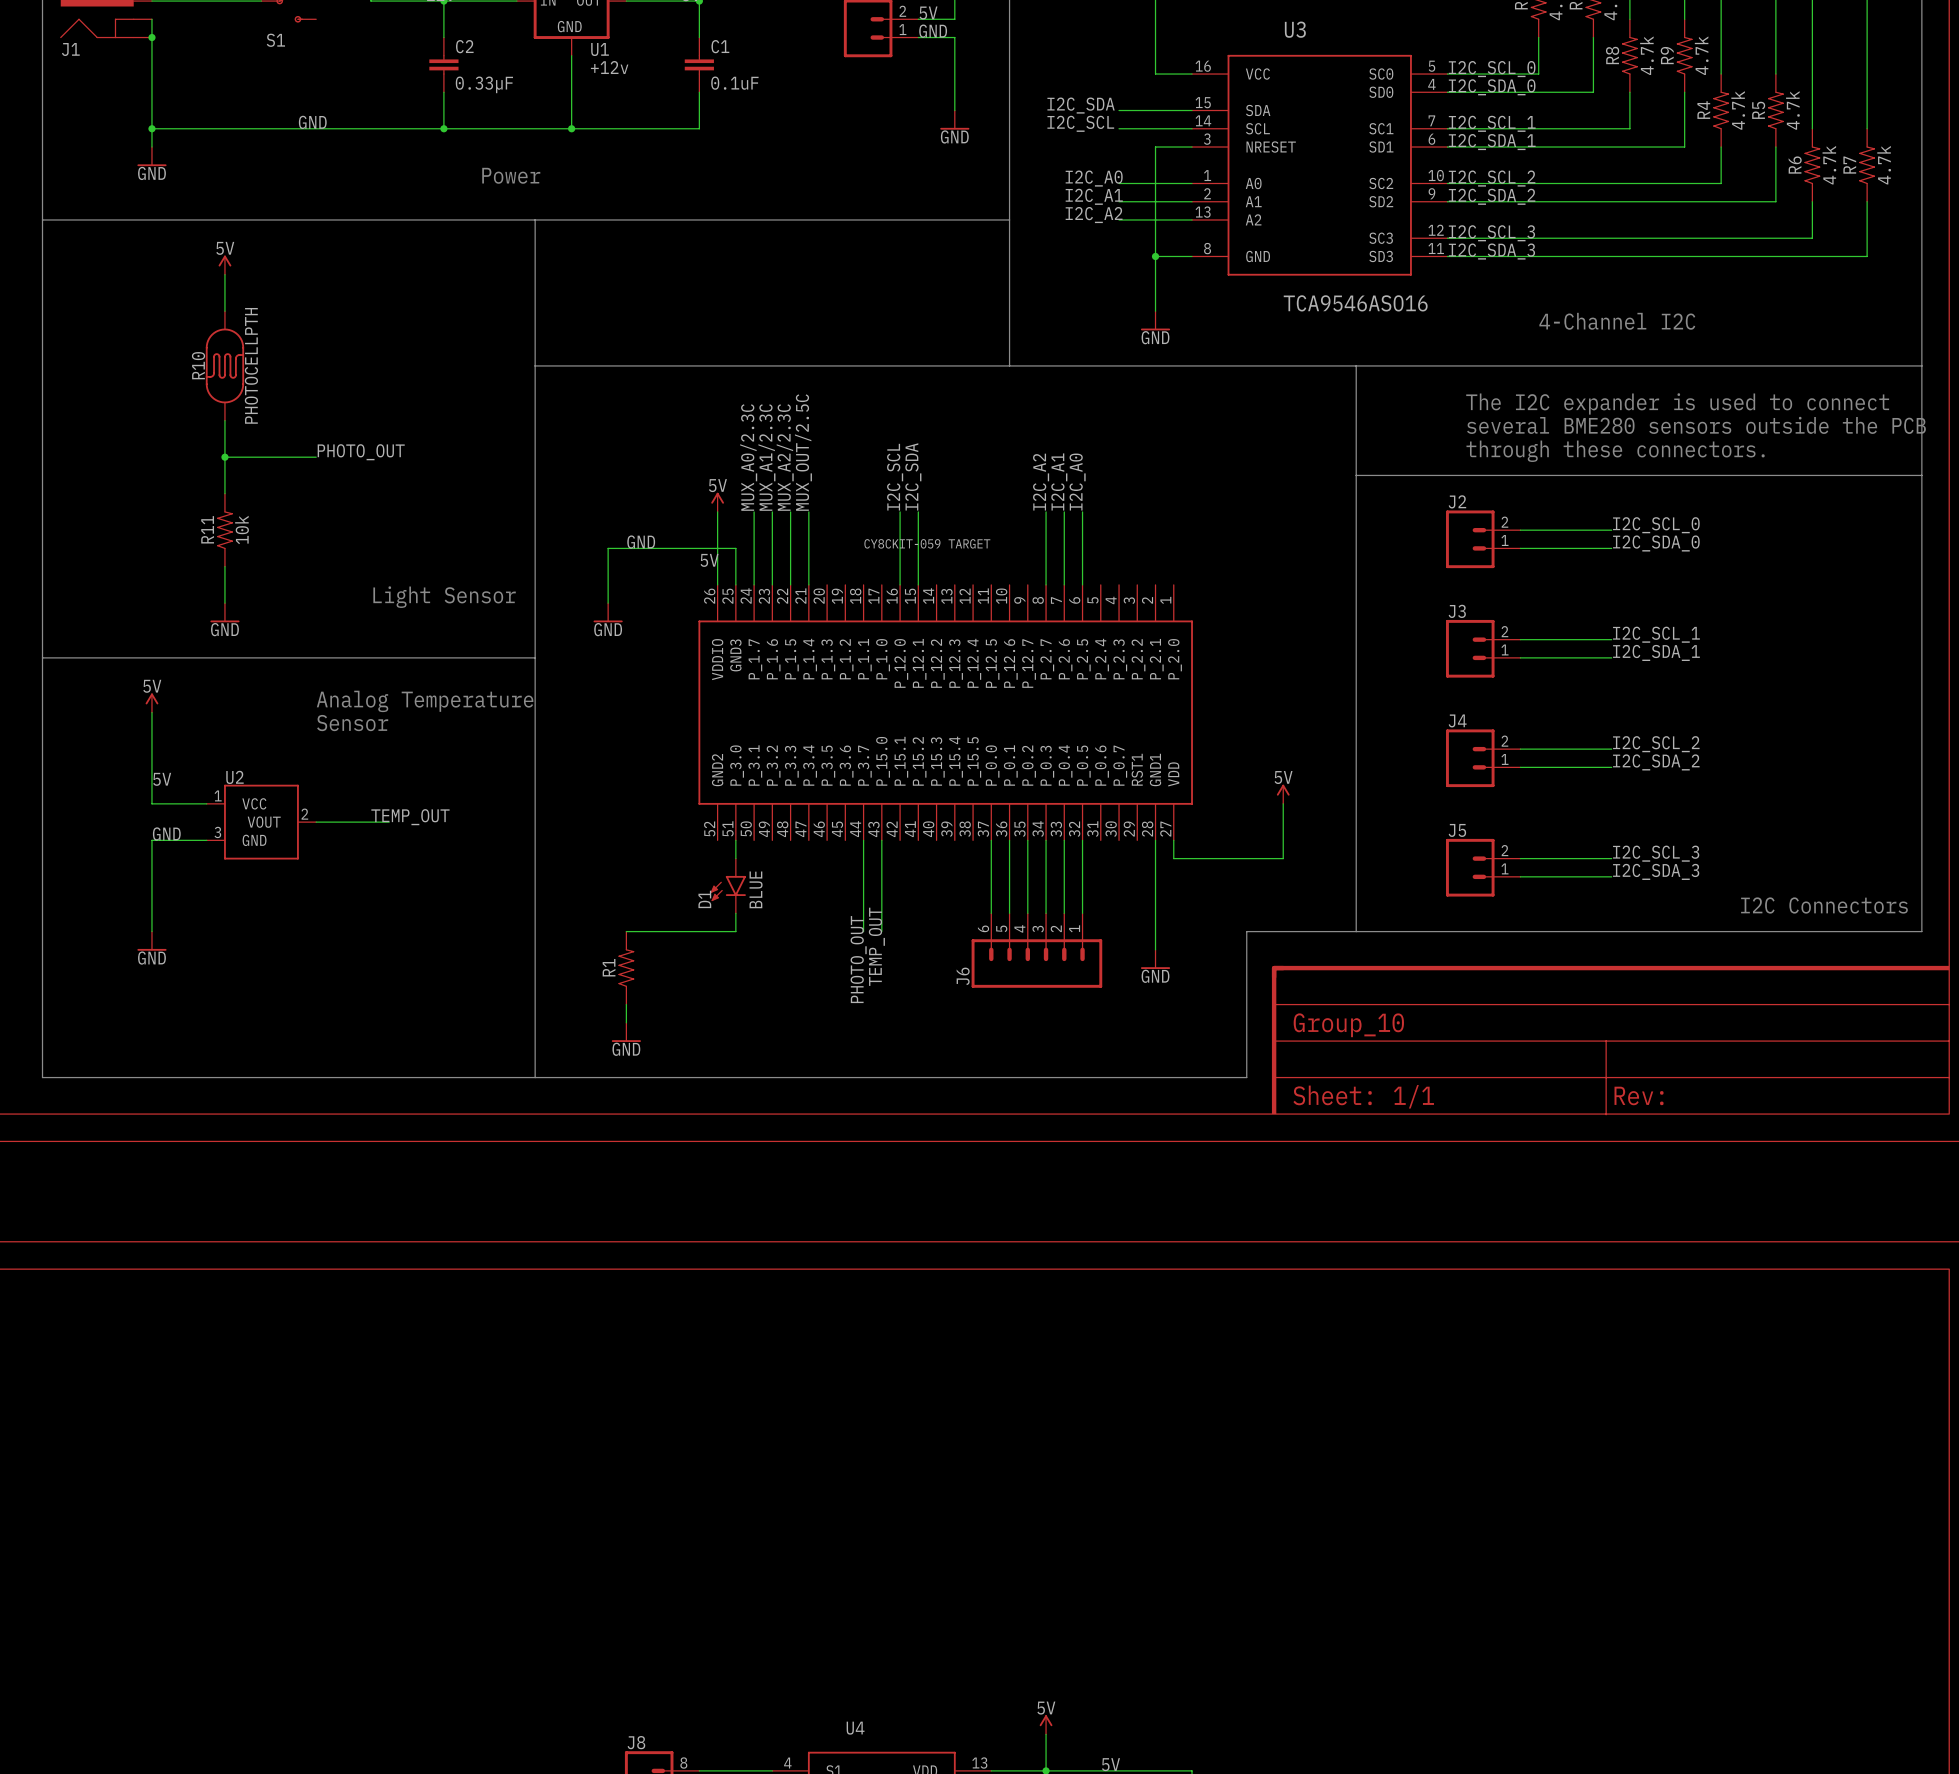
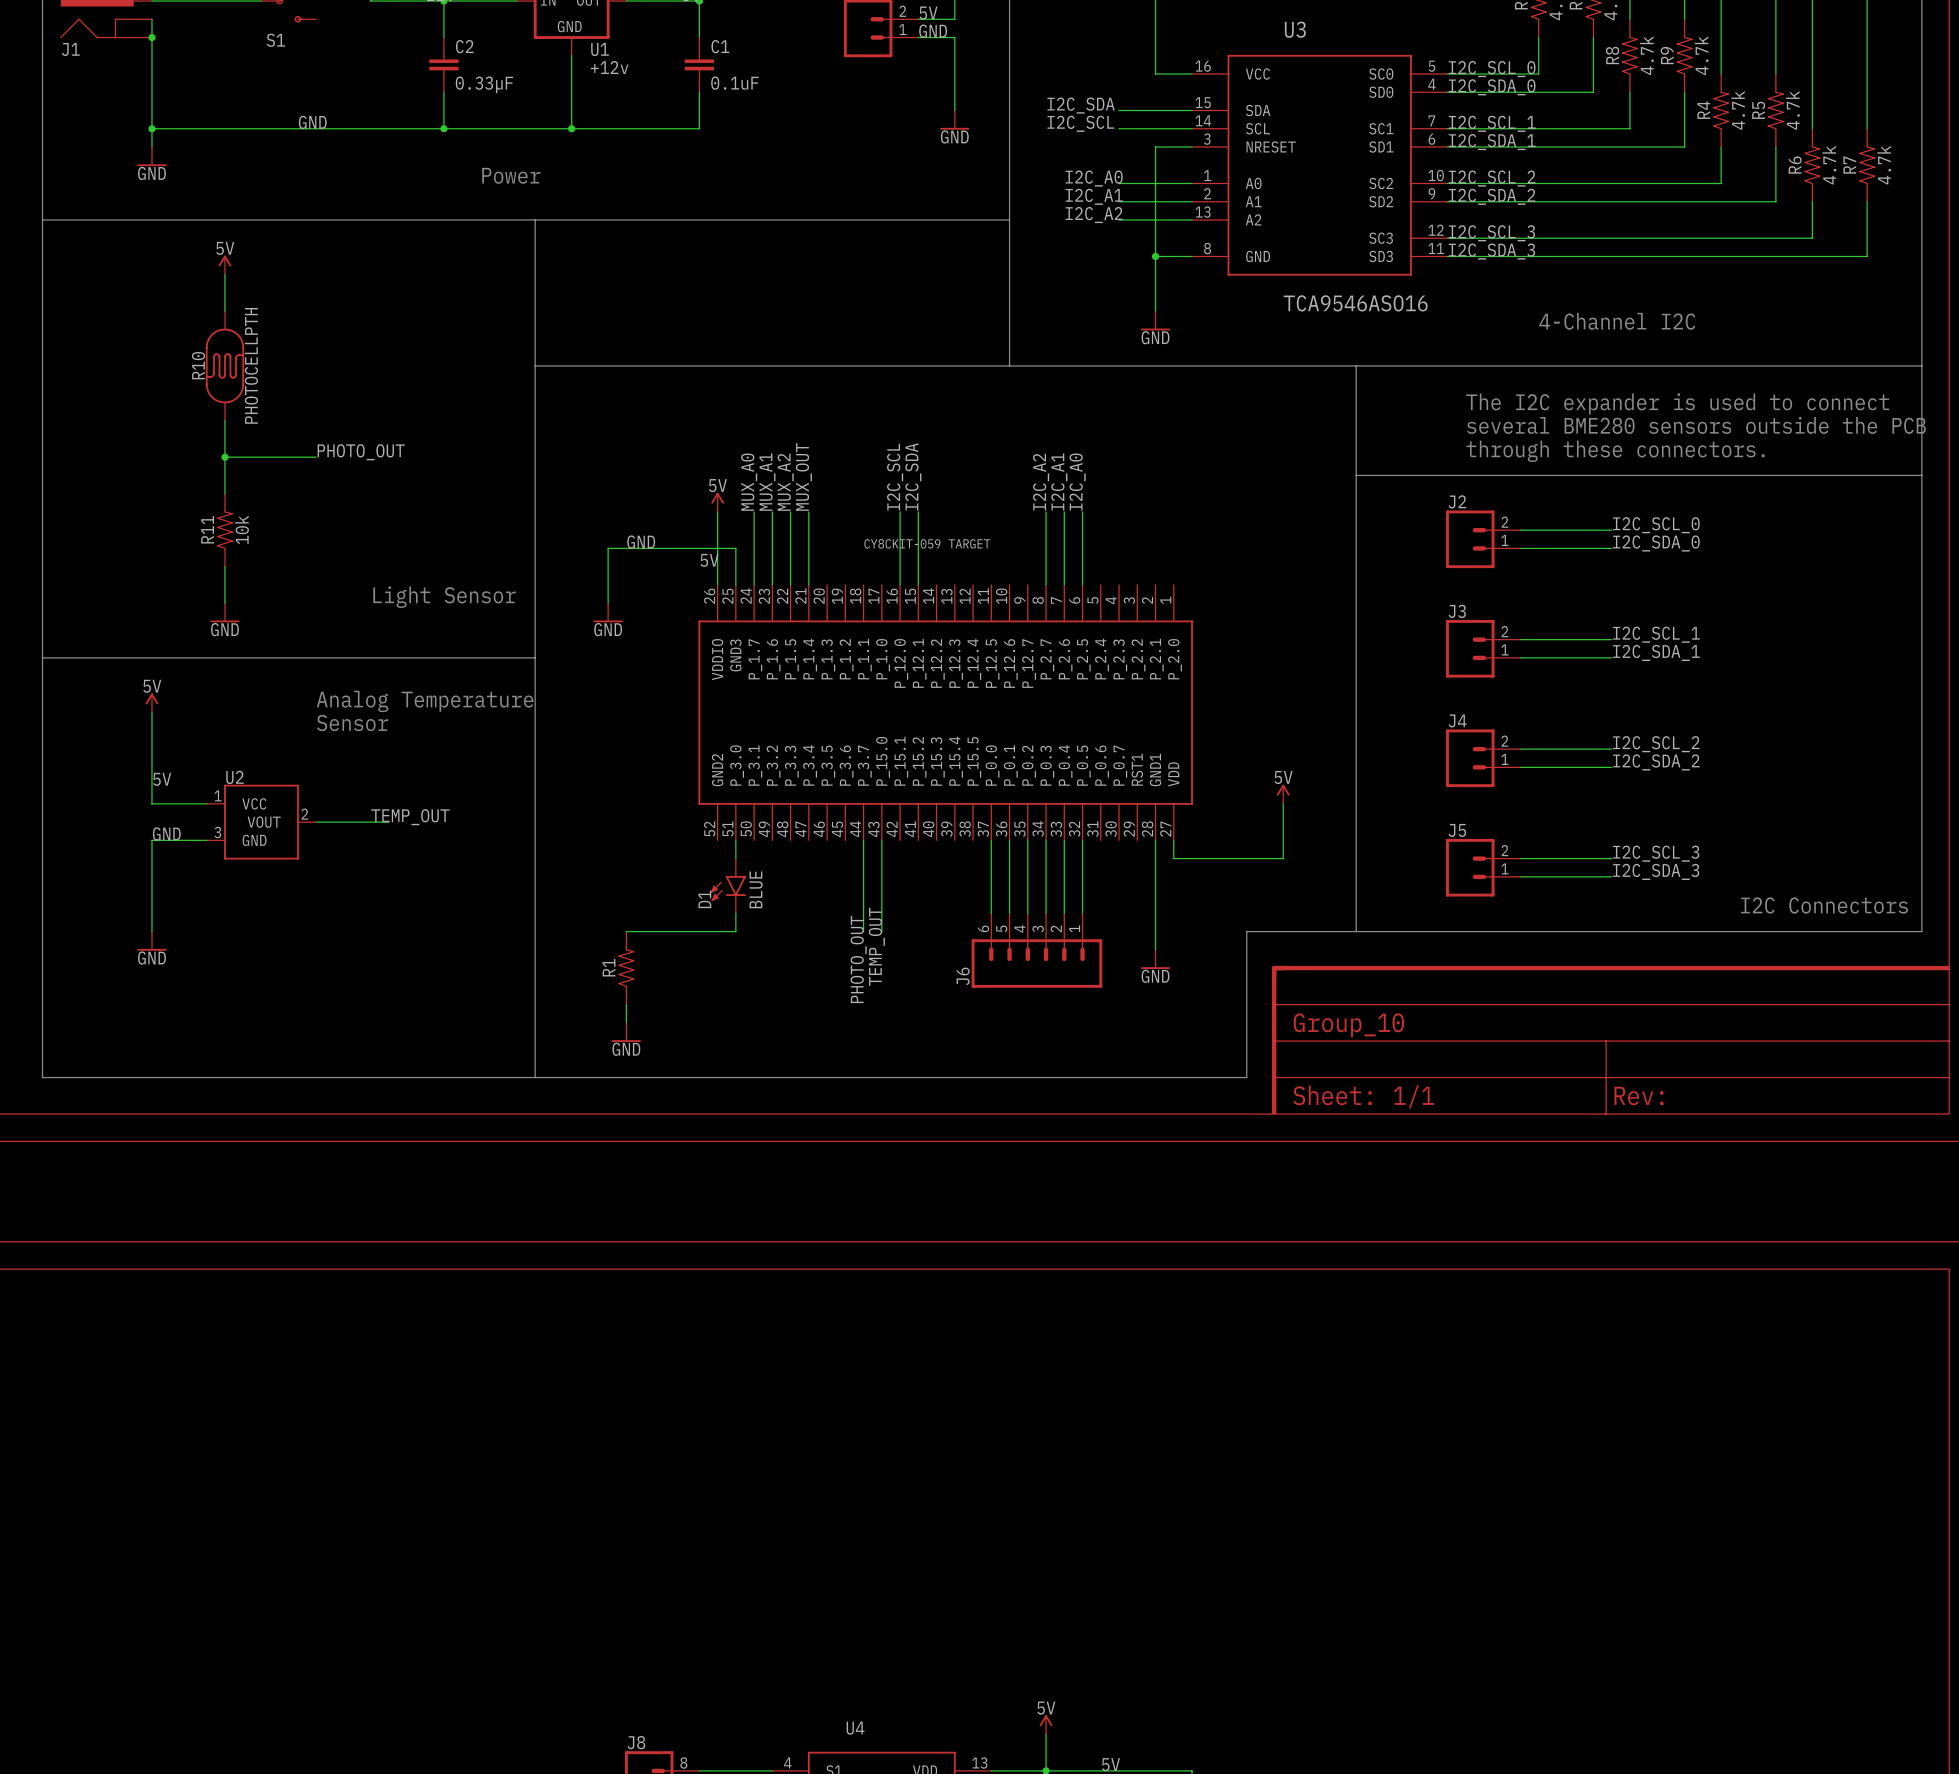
label: MUX_OUT/2.5C (803, 452) -> MUX_OUT (803, 476)
label: MUX_A0/2.3C (748, 457) -> MUX_A0 (749, 482)
label: MUX_A1/2.3C (766, 457) -> MUX_A1 (767, 482)
label: MUX_A2/2.3C (785, 457) -> MUX_A2 (785, 482)

